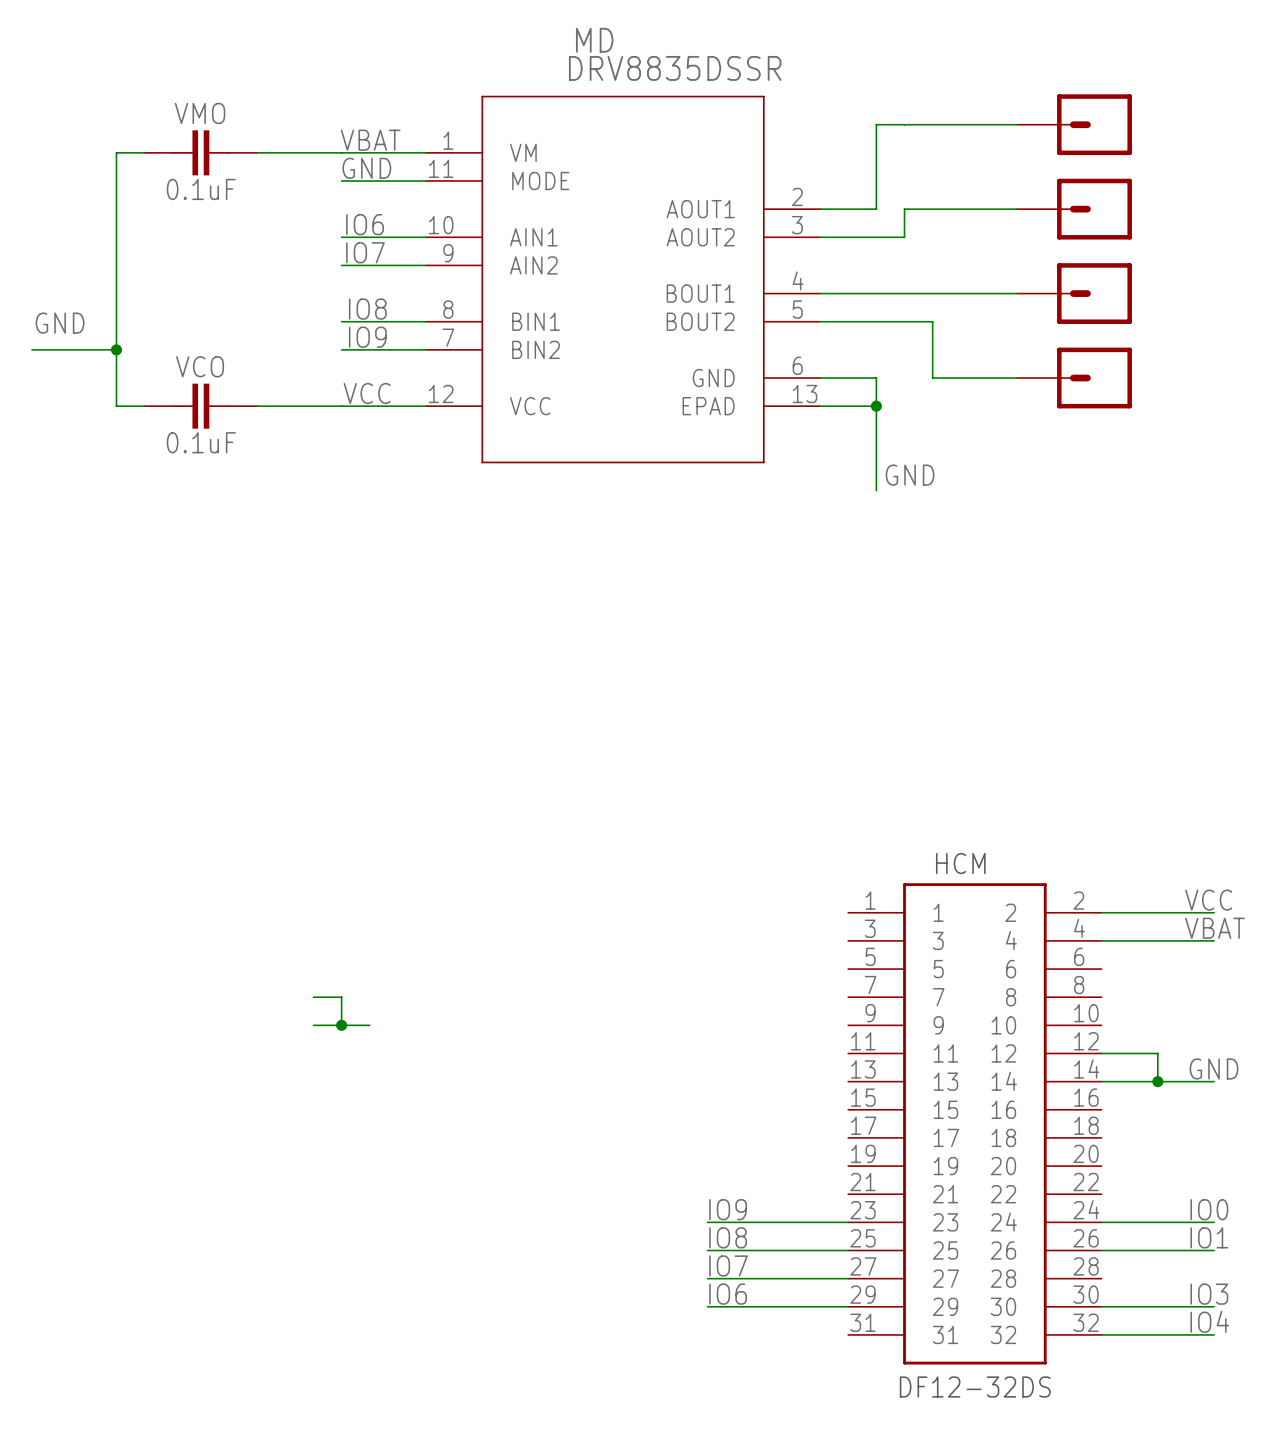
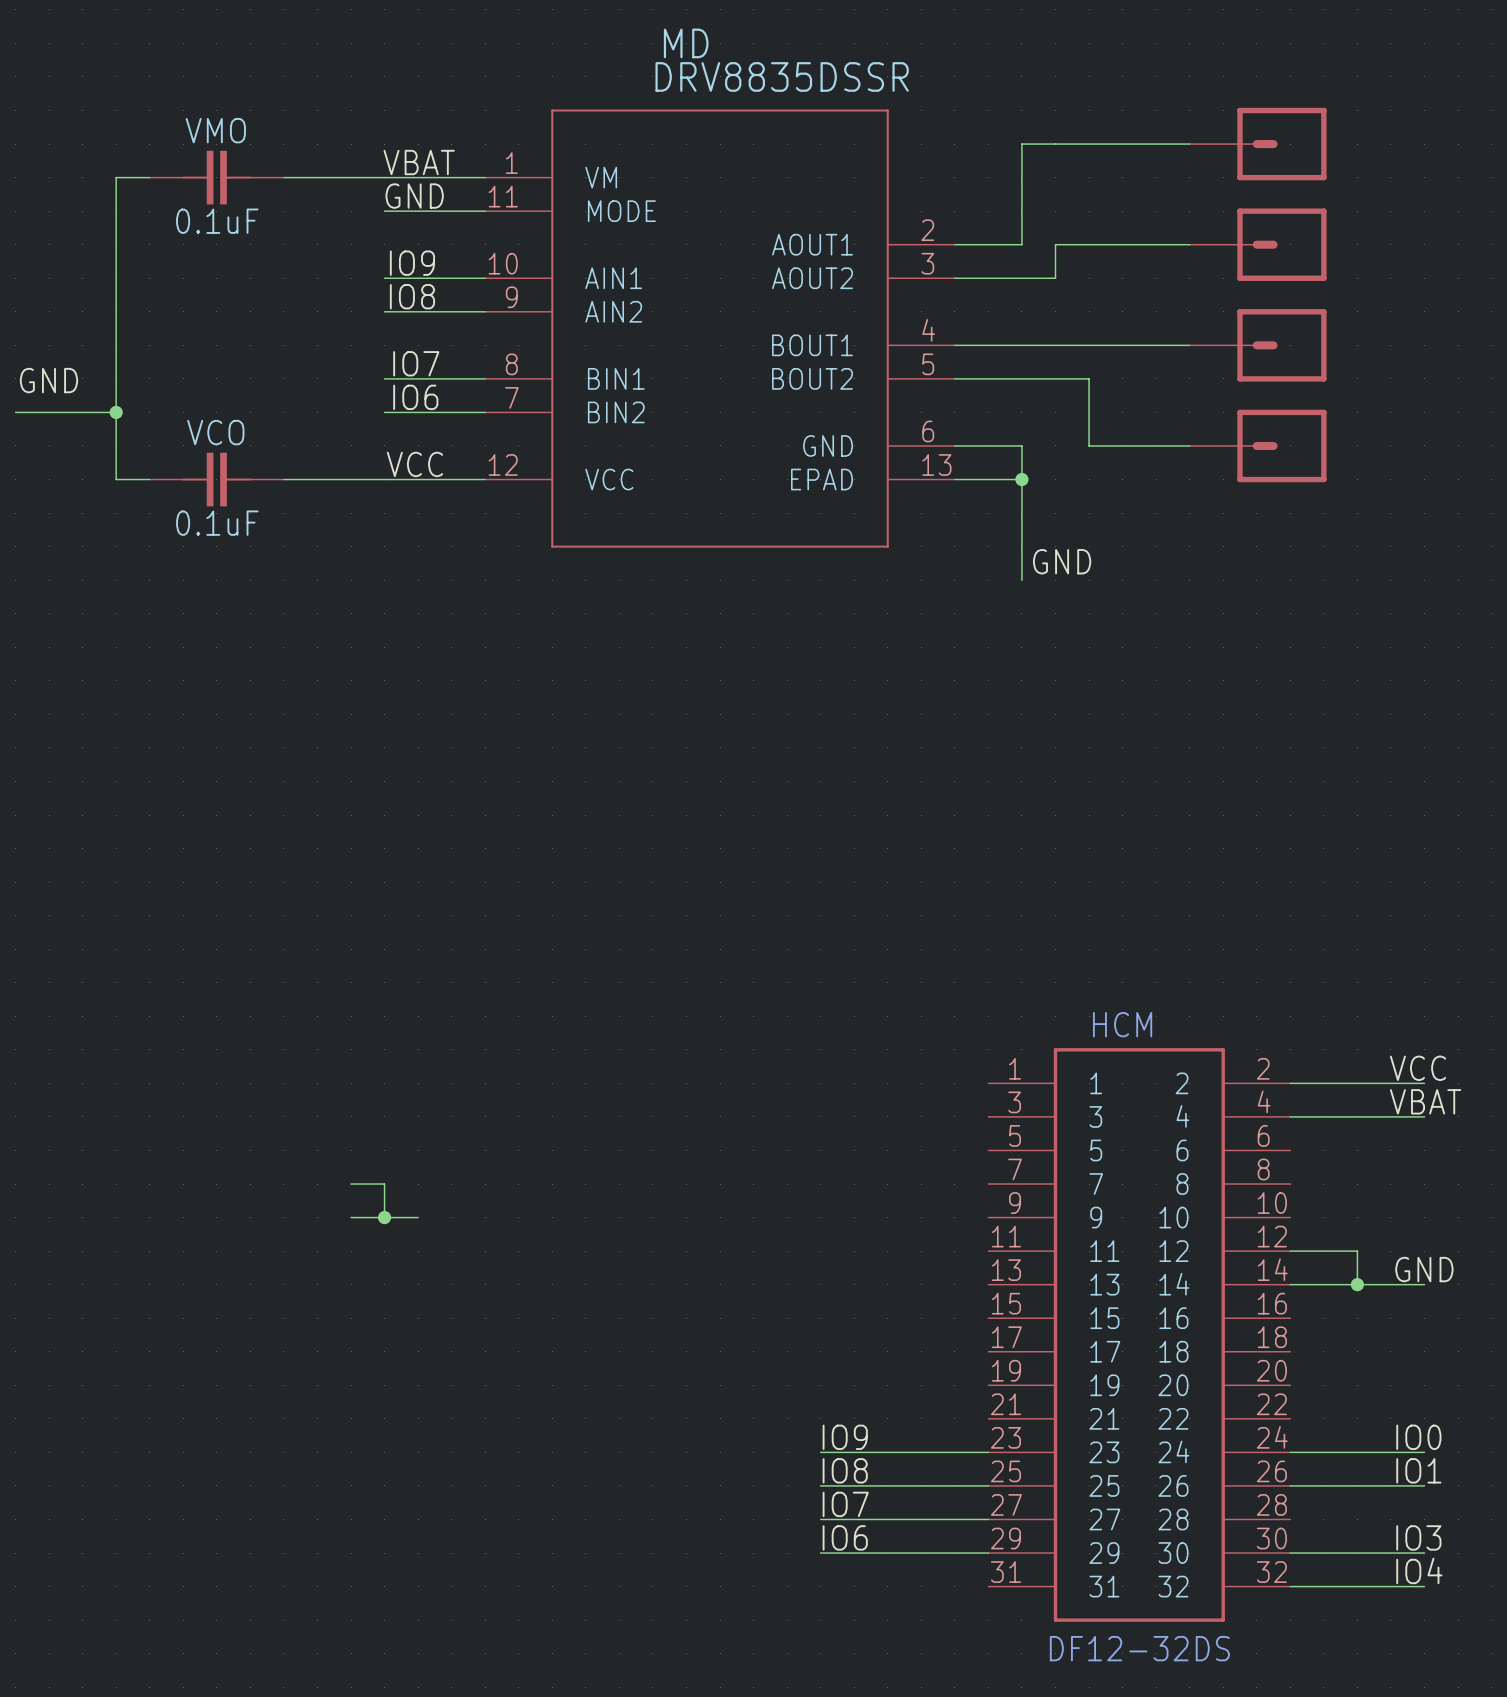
label: IO6 (365, 224) -> IO9 (412, 263)
label: IO7 (365, 252) -> IO8 (412, 296)
label: IO8 (367, 309) -> IO7 (416, 363)
label: IO9 (367, 337) -> IO6 (415, 397)

